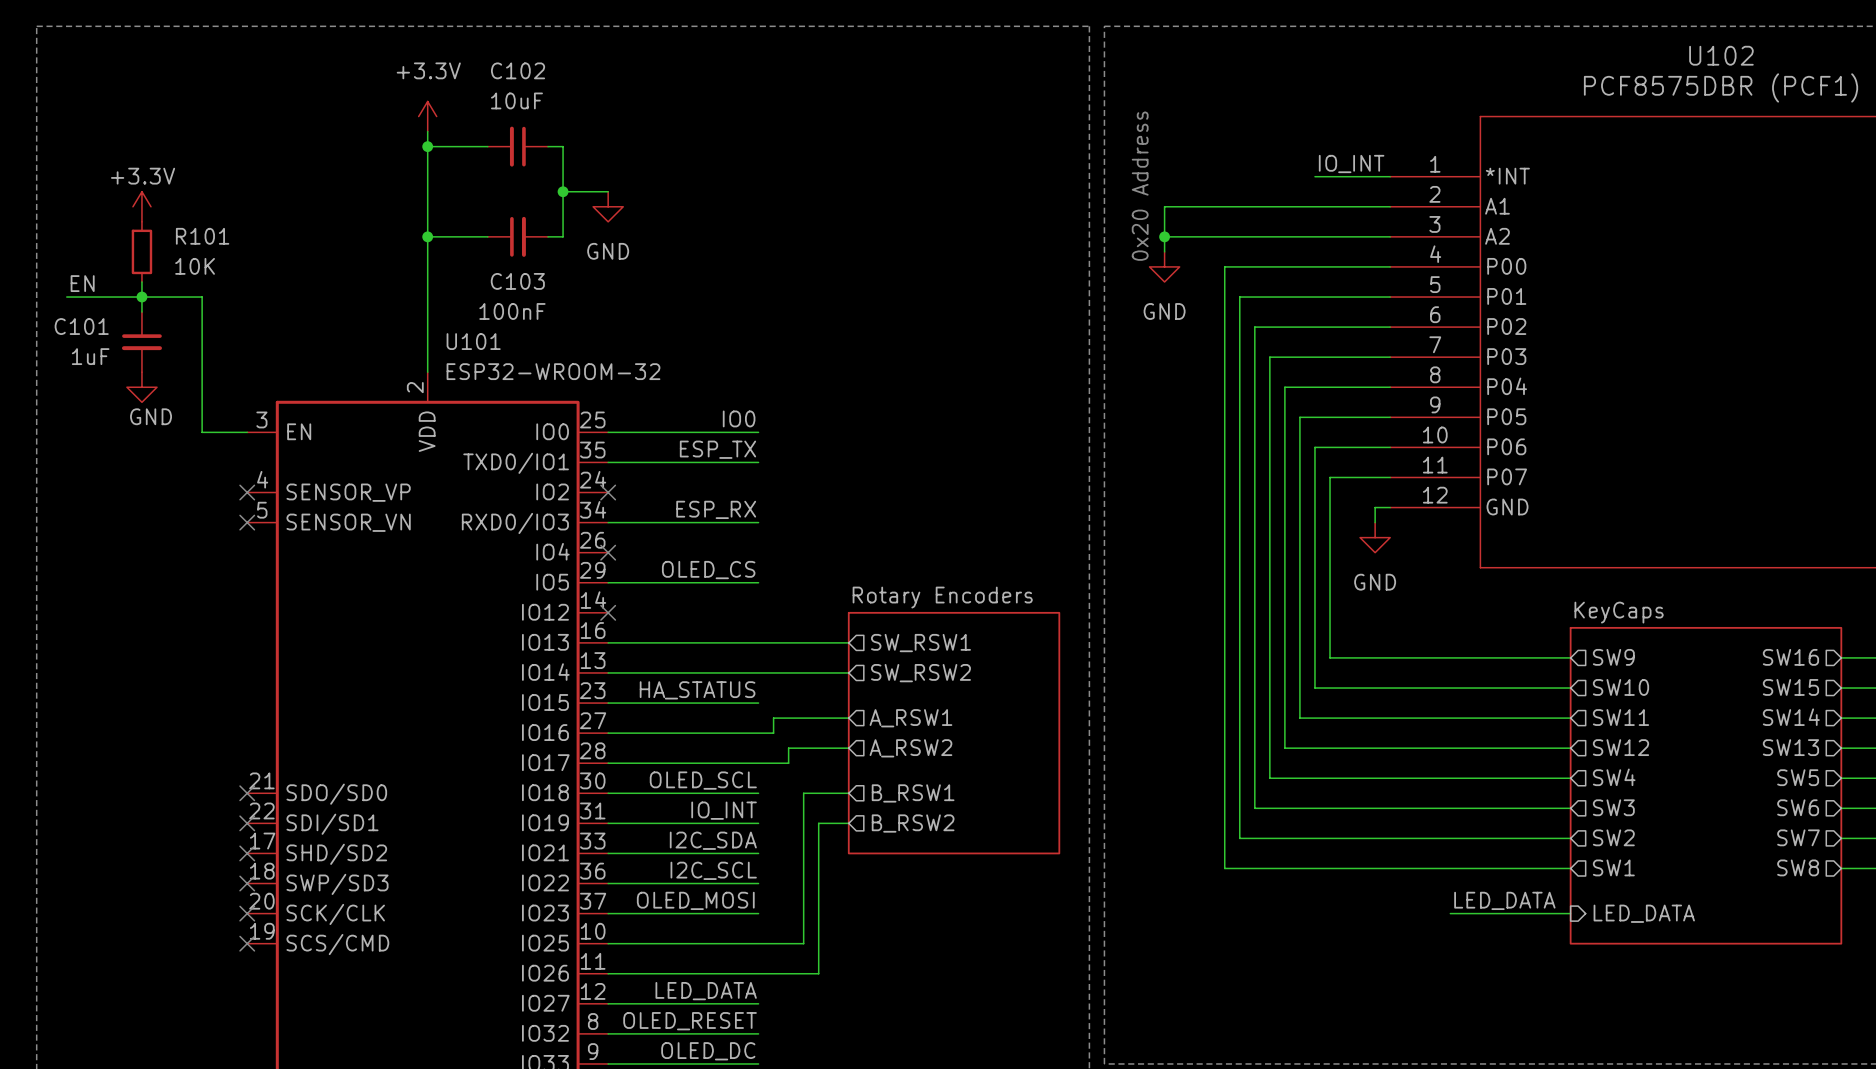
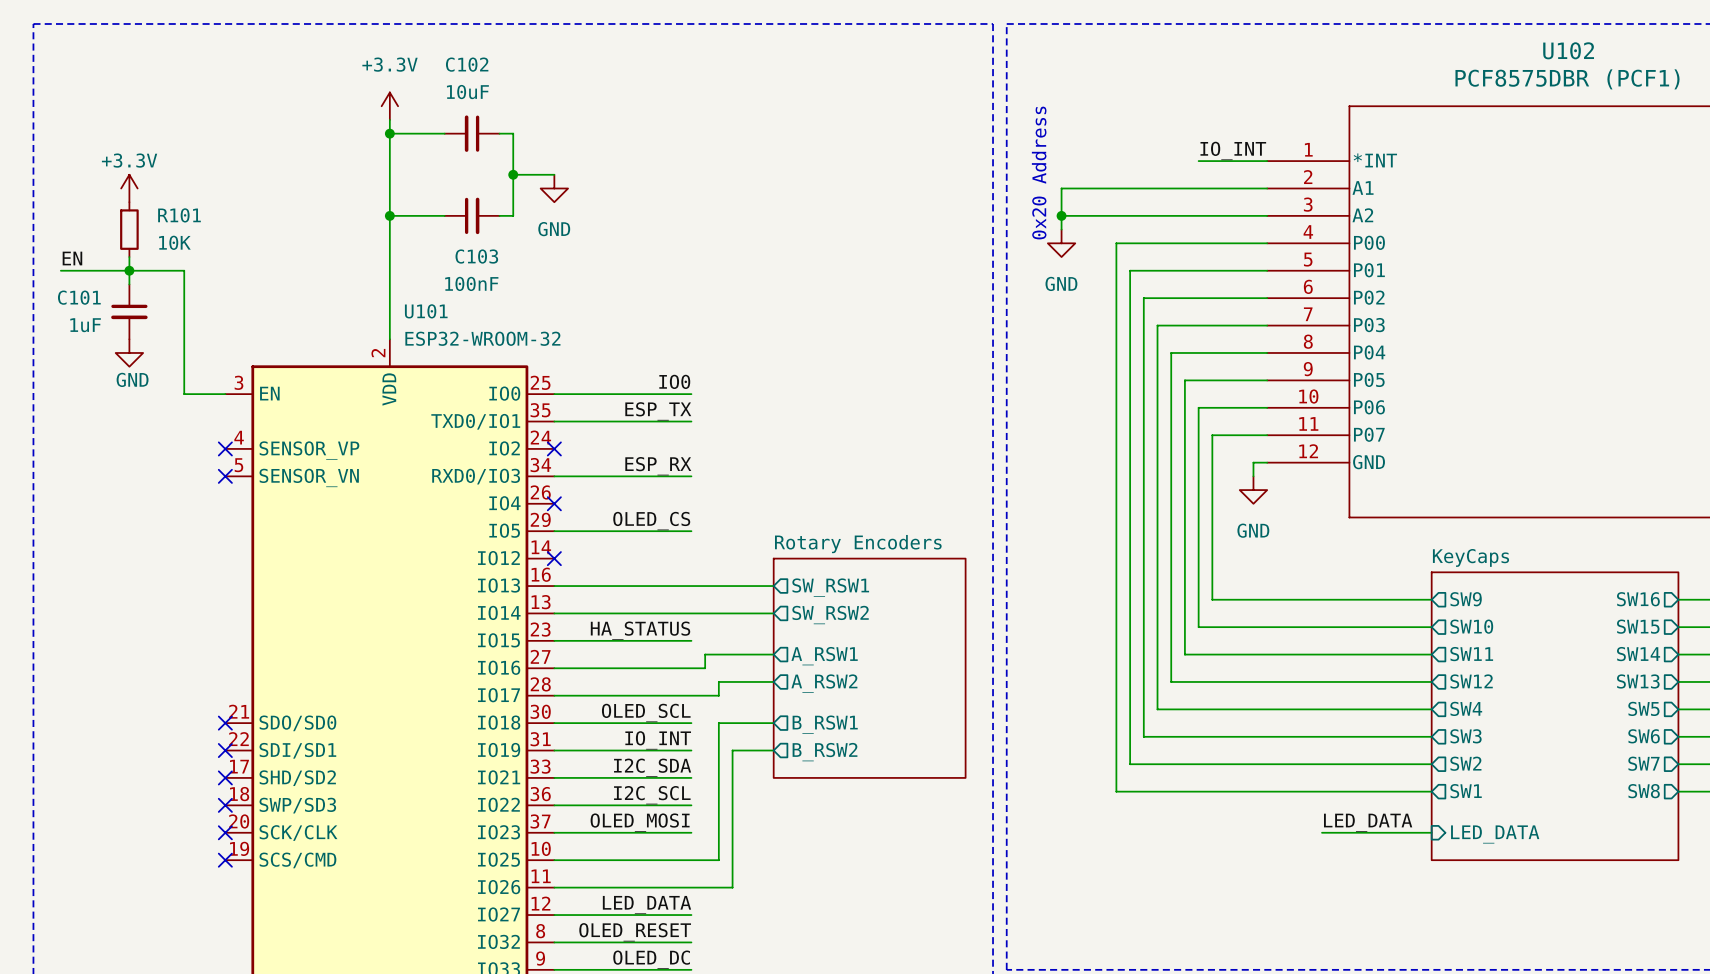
wire: (803, 793) (803, 823) -> (746, 750) (732, 750)
wire: none -> (732, 723) (718, 723) (718, 860)
wire: (818, 823) (818, 973) (803, 973) -> none
wire: (788, 943) (803, 943) -> (732, 887) (732, 860)

